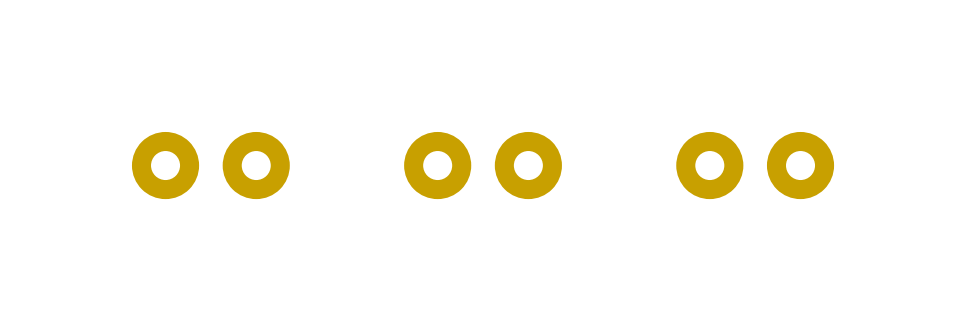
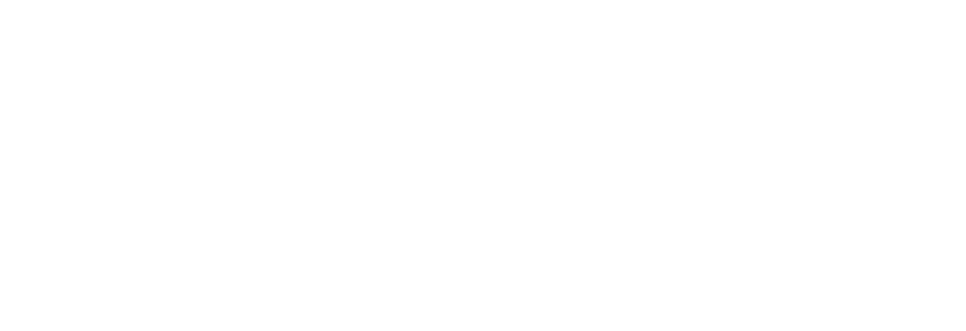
part: (210, 165) -> none
part: (483, 165) -> none
part: (755, 165) -> none

